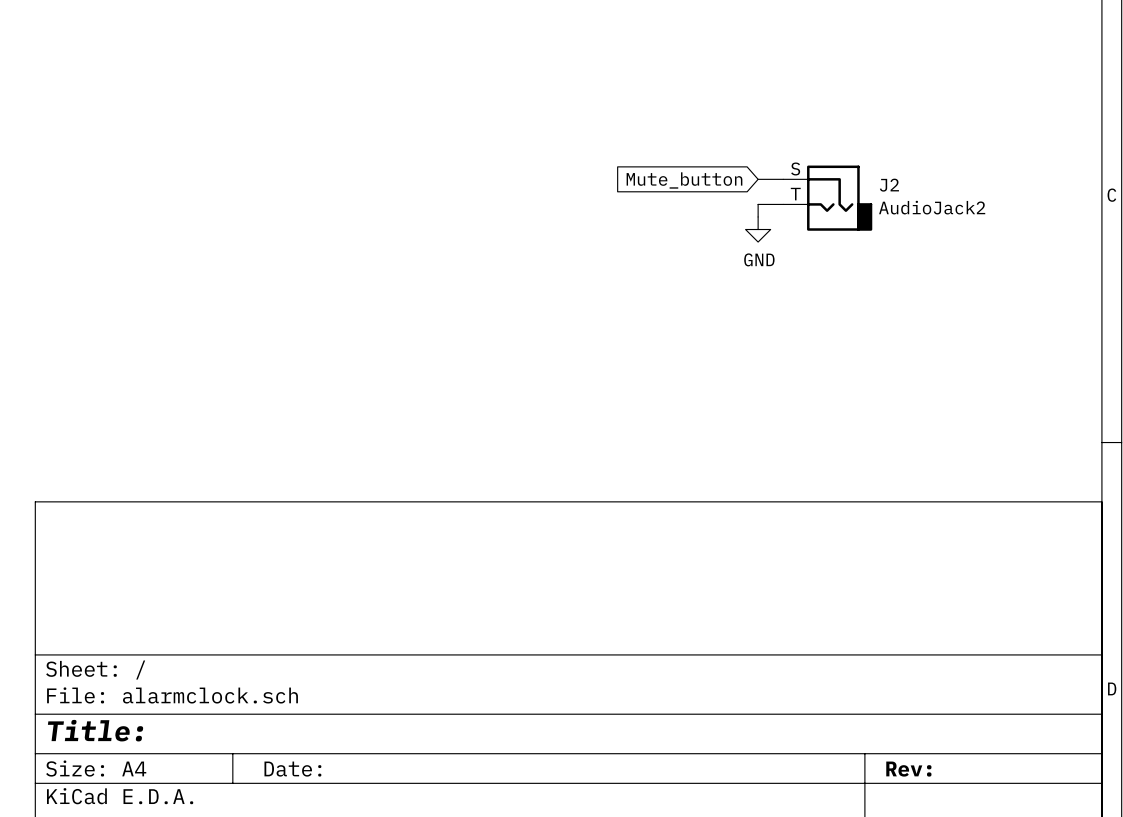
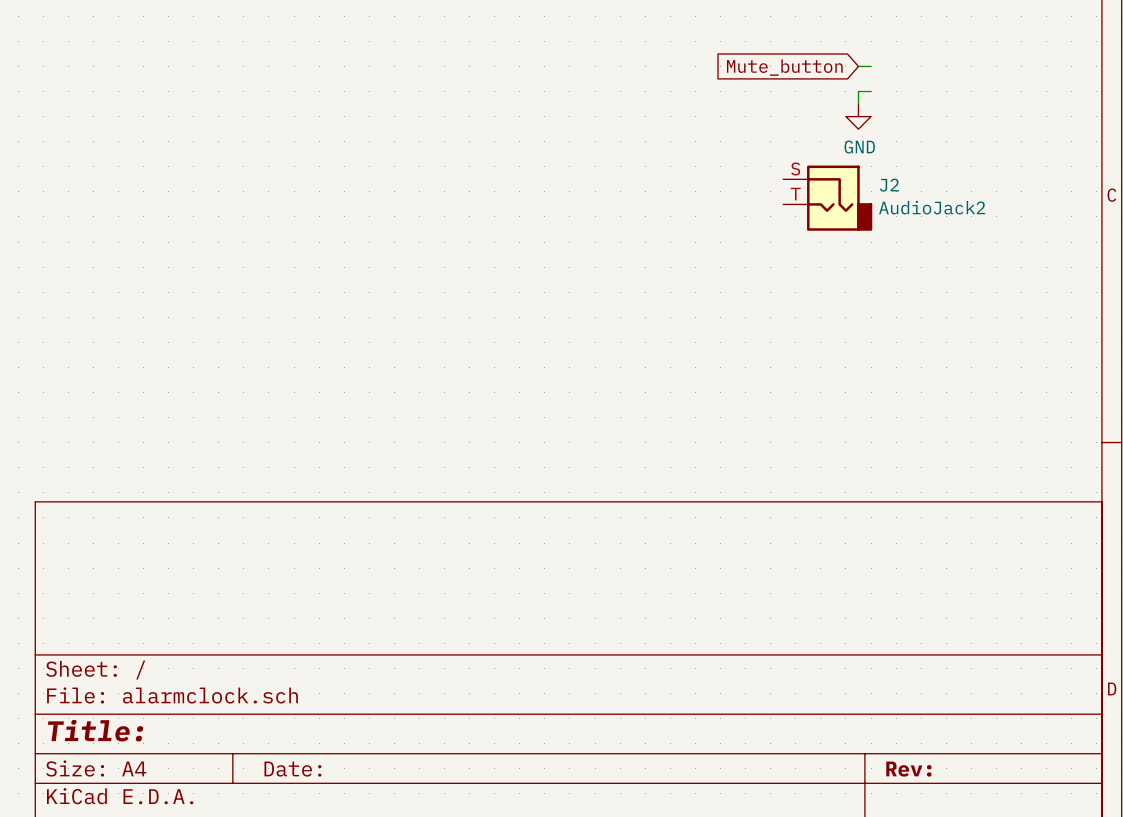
wire: none -> (858, 66) (871, 66)
wire: none -> (871, 91) (858, 91) (858, 104)
wire: (758, 179) (783, 179) -> none
global label position: Mute_button (684, 180) -> Mute_button (784, 67)
wire: (783, 204) (758, 204) (758, 216) -> none
power symbol position: GND (758, 229) -> GND (858, 116)

